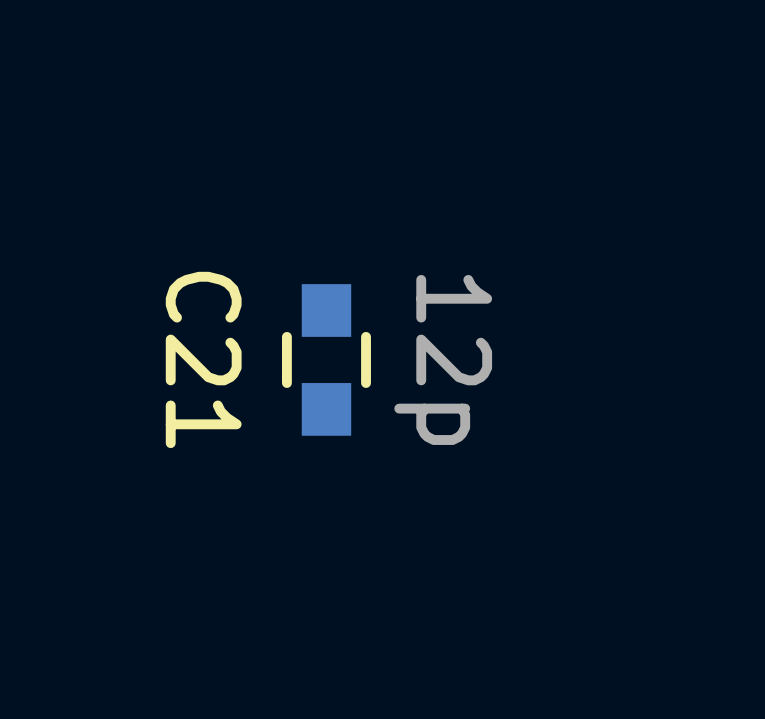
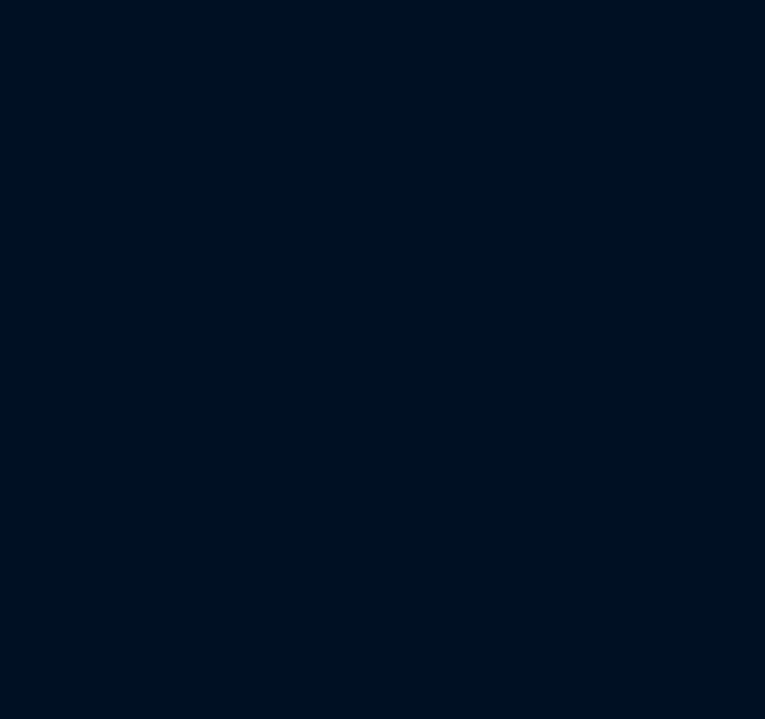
C21: 12p (326, 359) -> none

